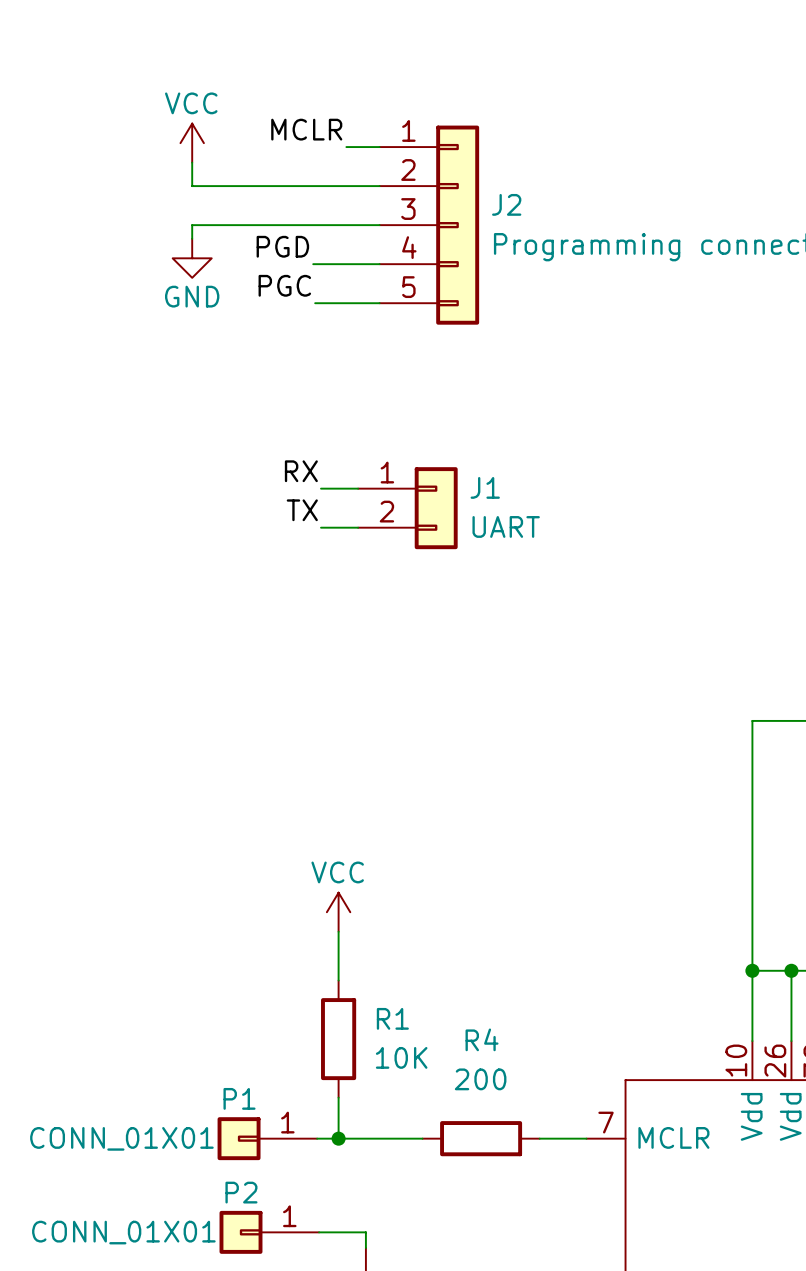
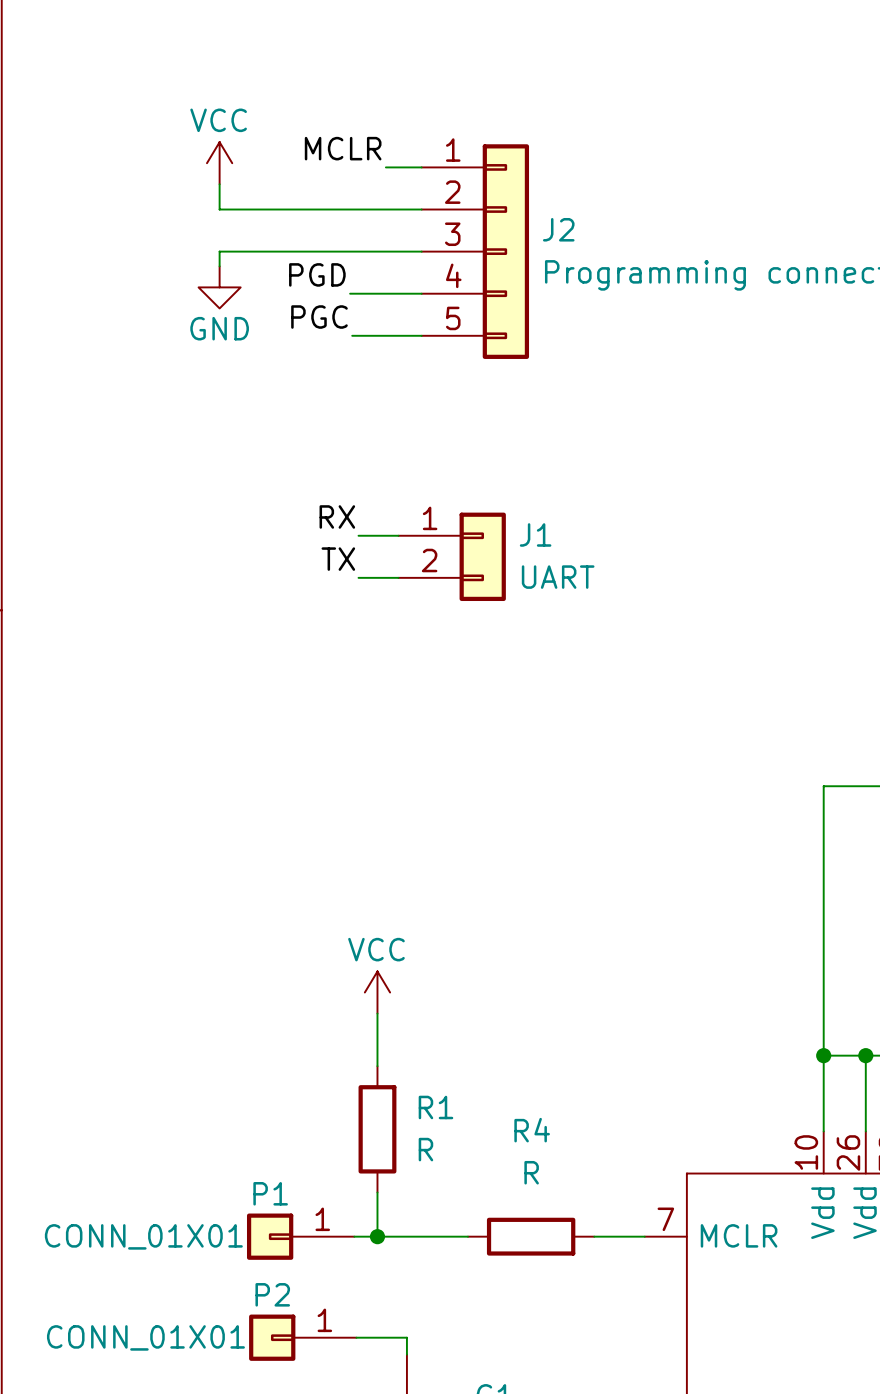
R1 value: 10K (401, 1057) -> R (425, 1149)
R4 value: 200 (480, 1079) -> R (531, 1172)

